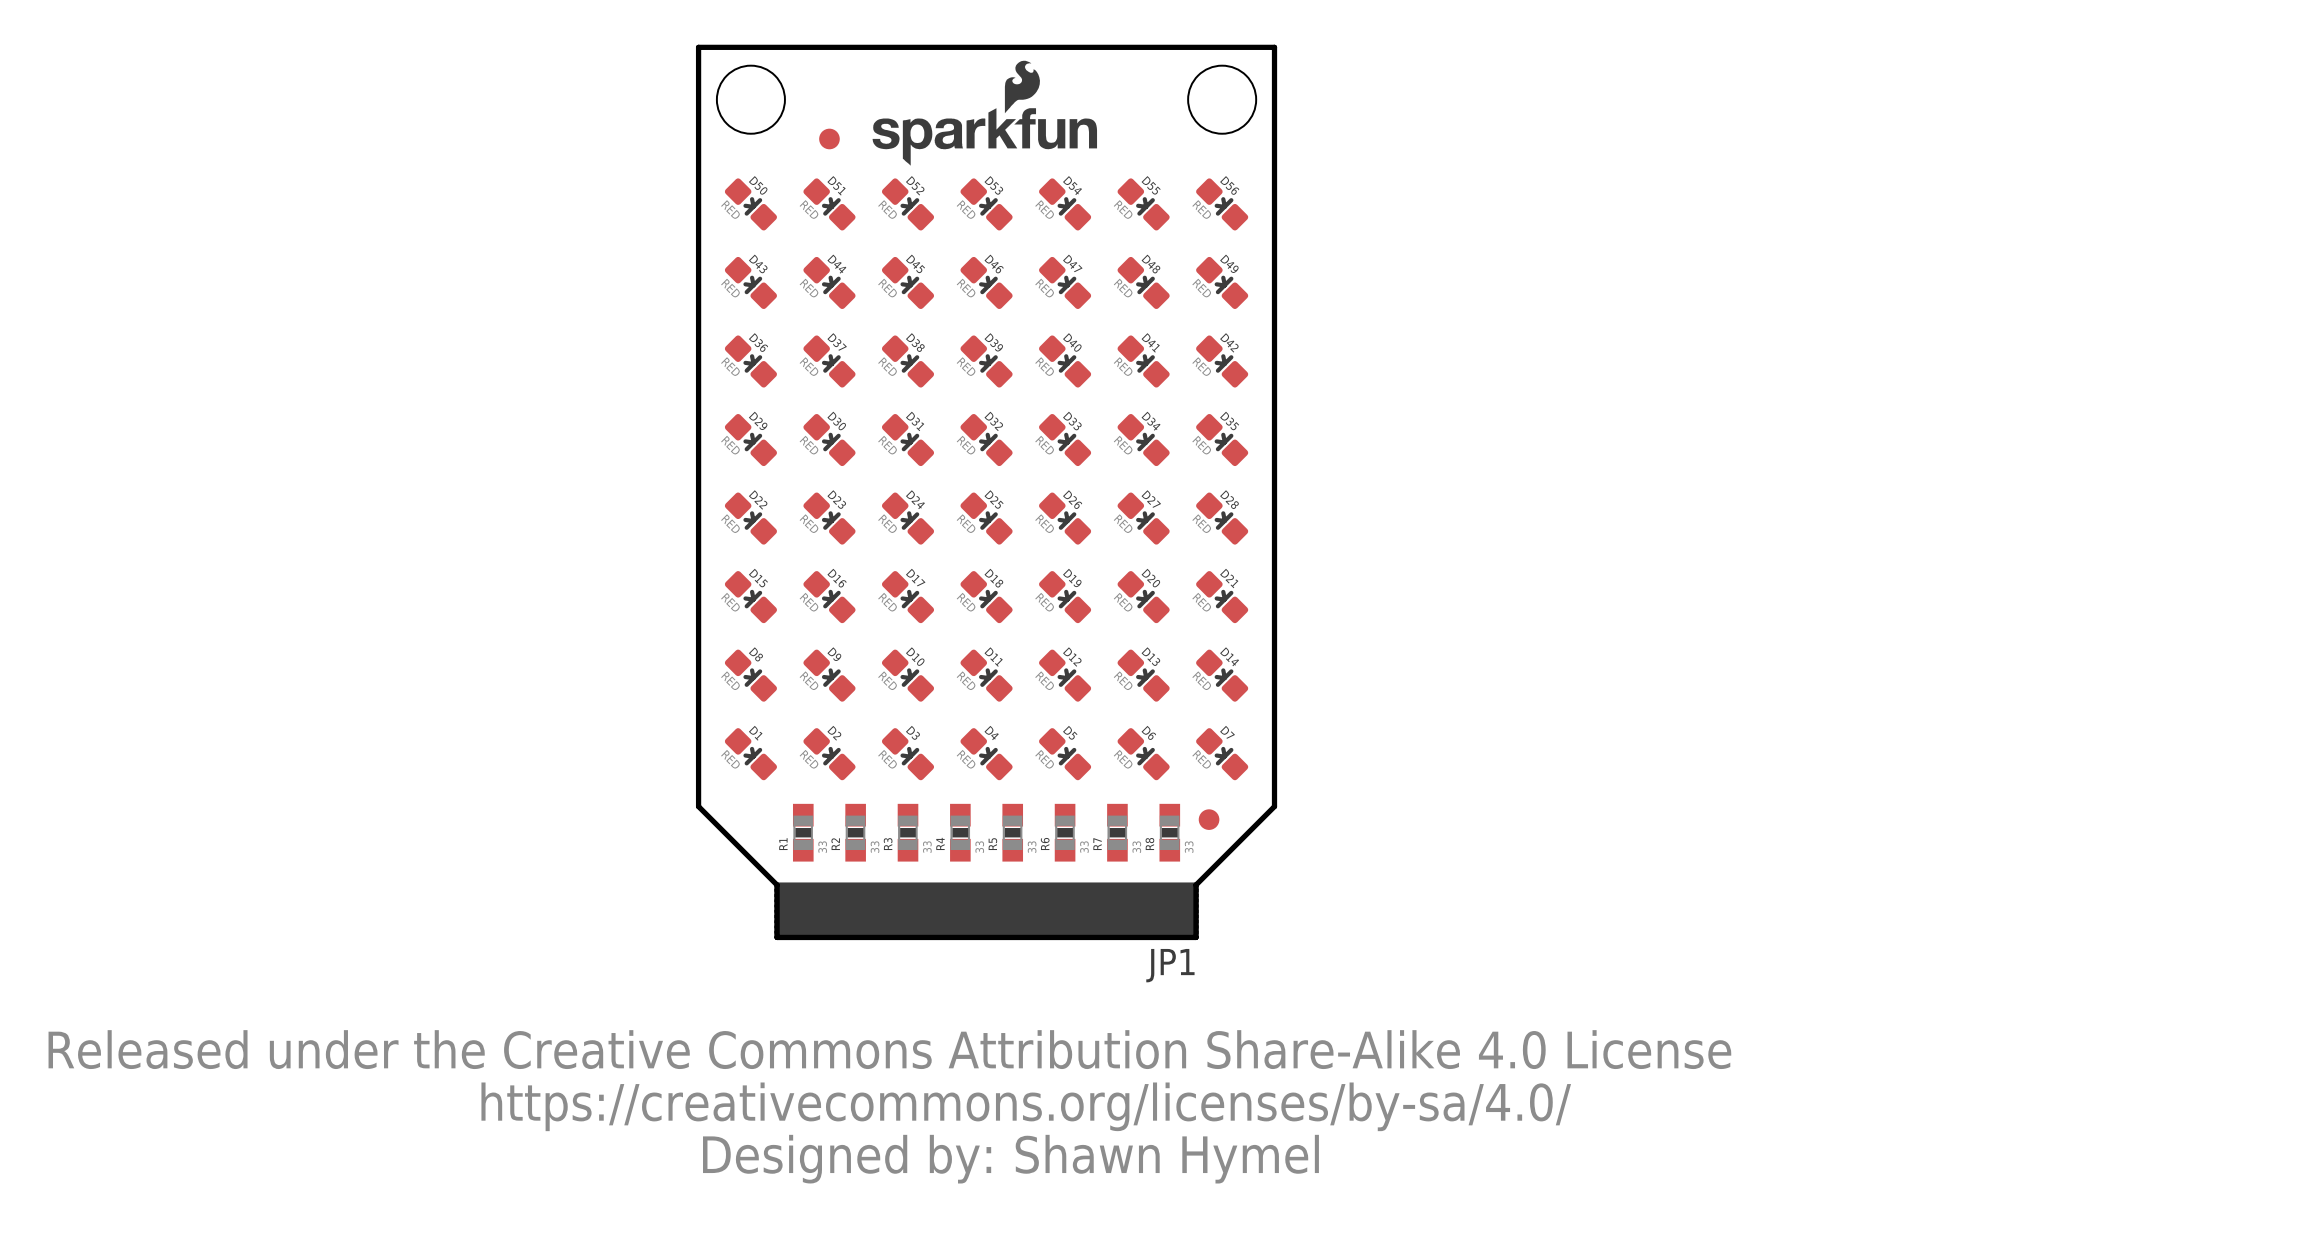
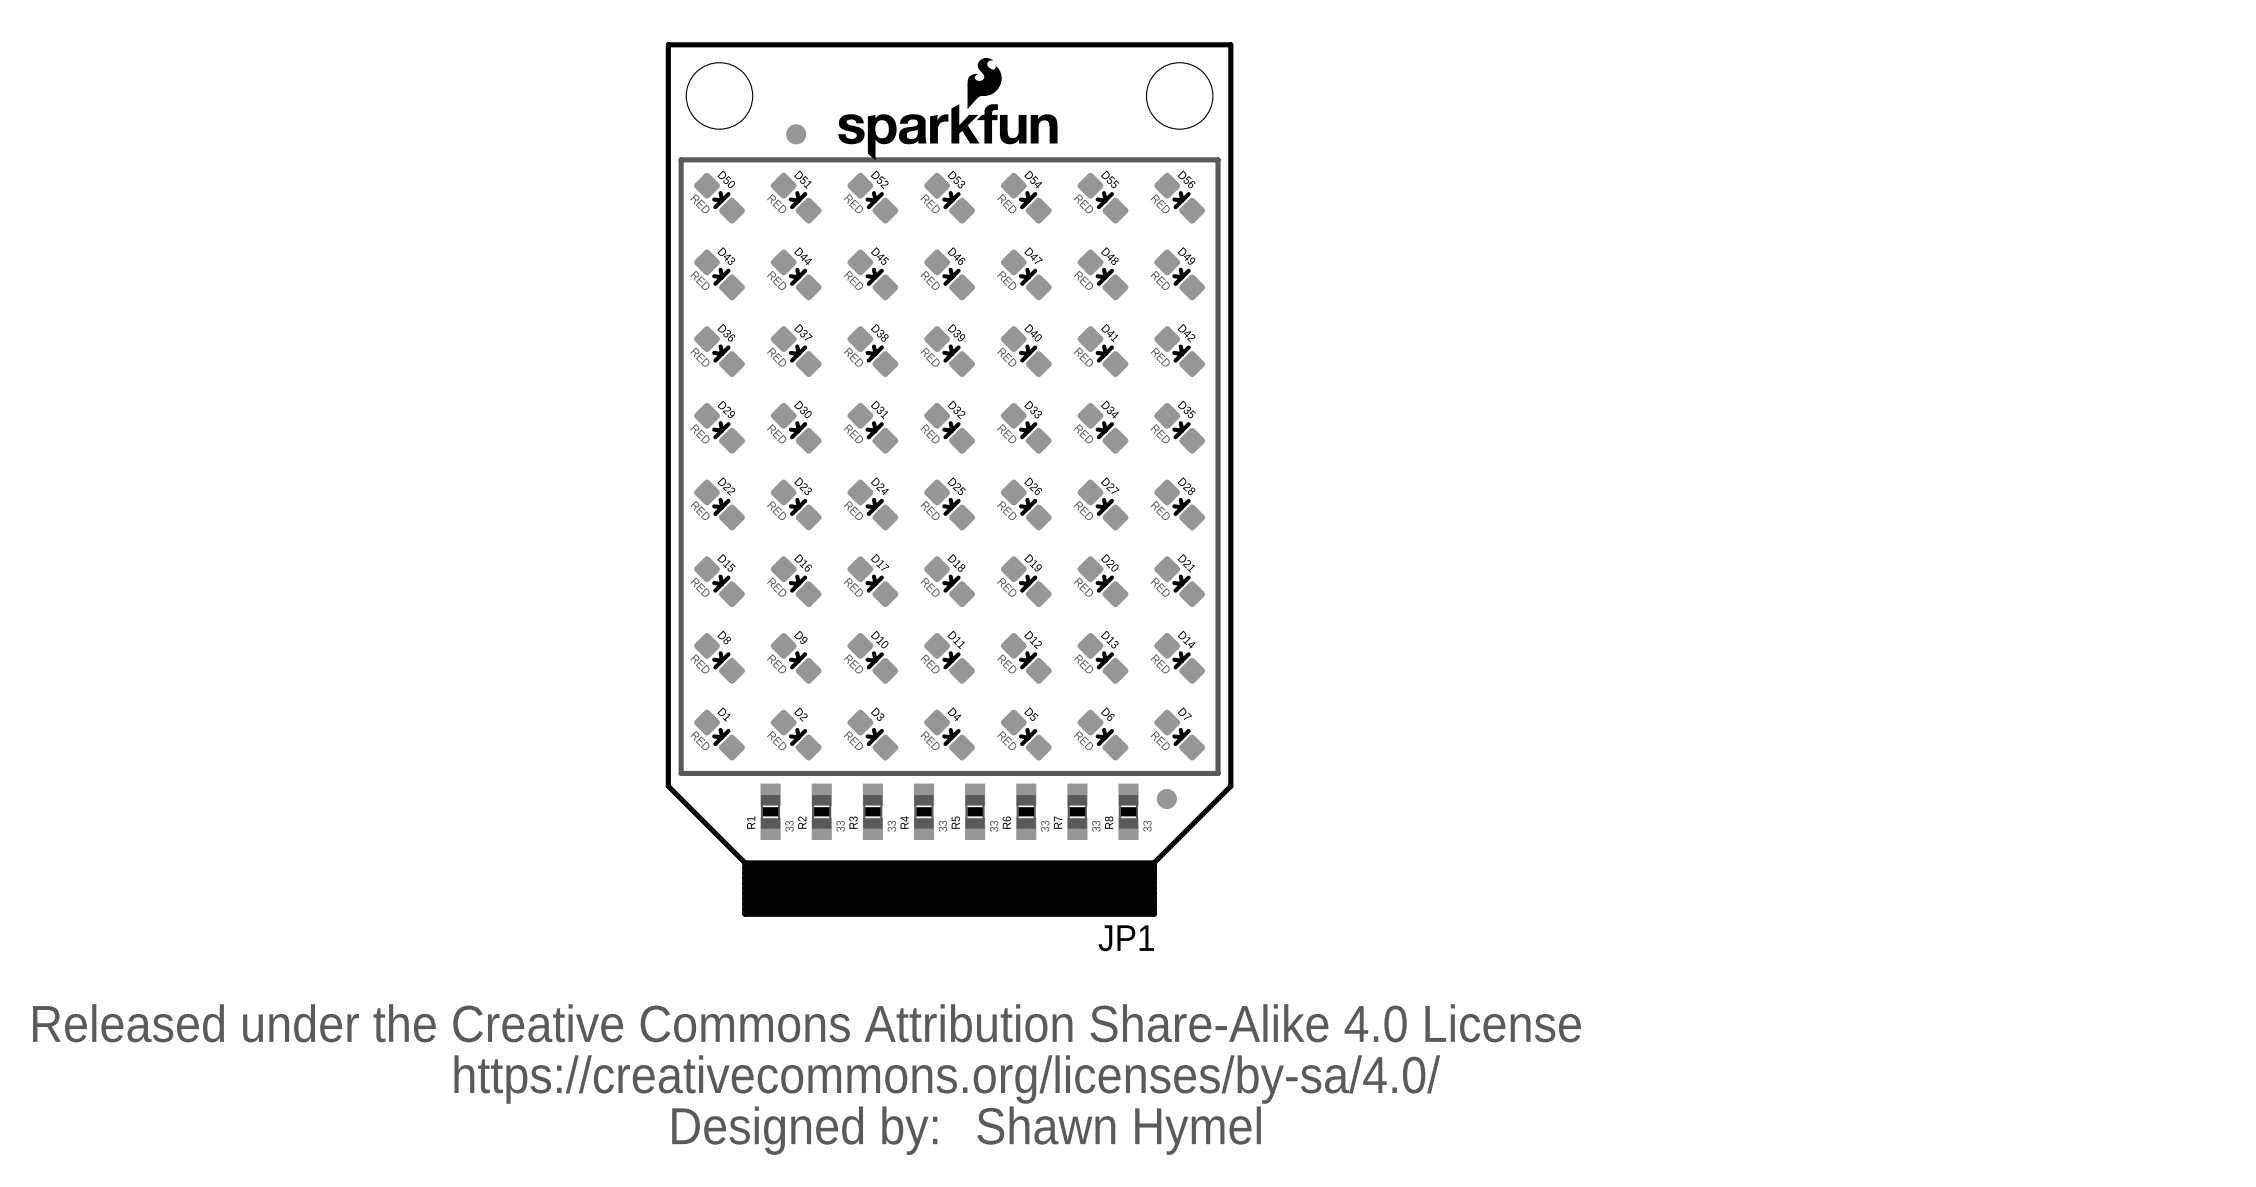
line: none -> (681, 159) (1218, 159) (1218, 773) (681, 773) (681, 159)

